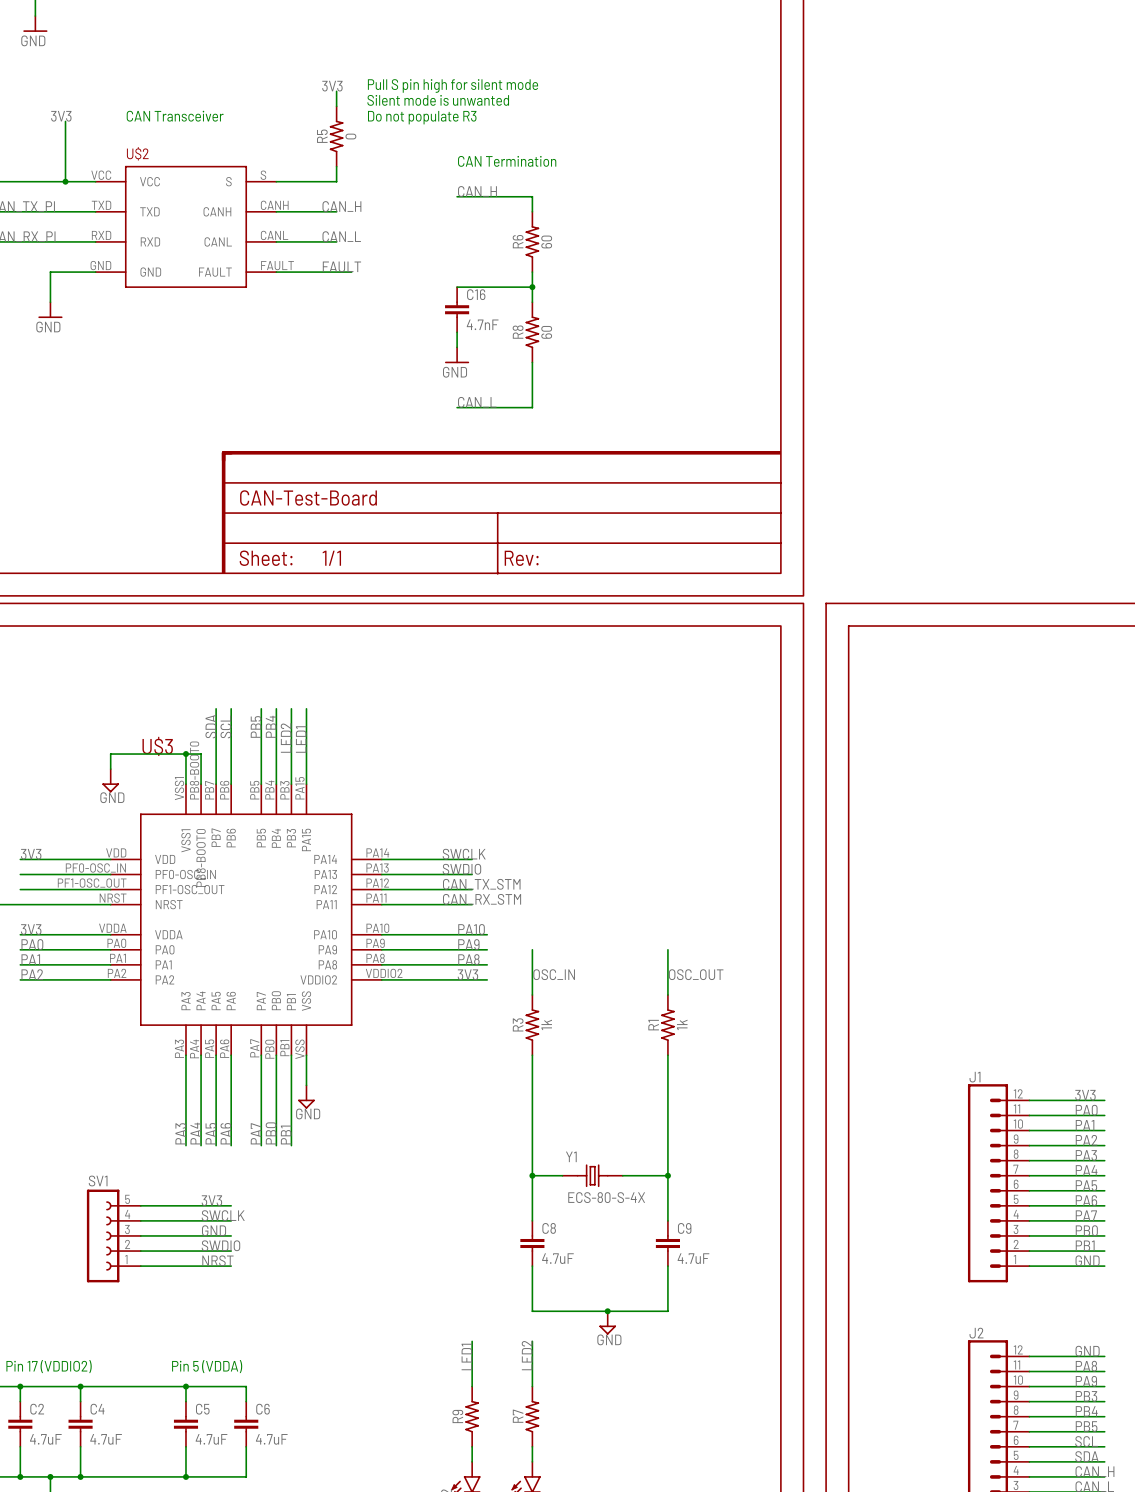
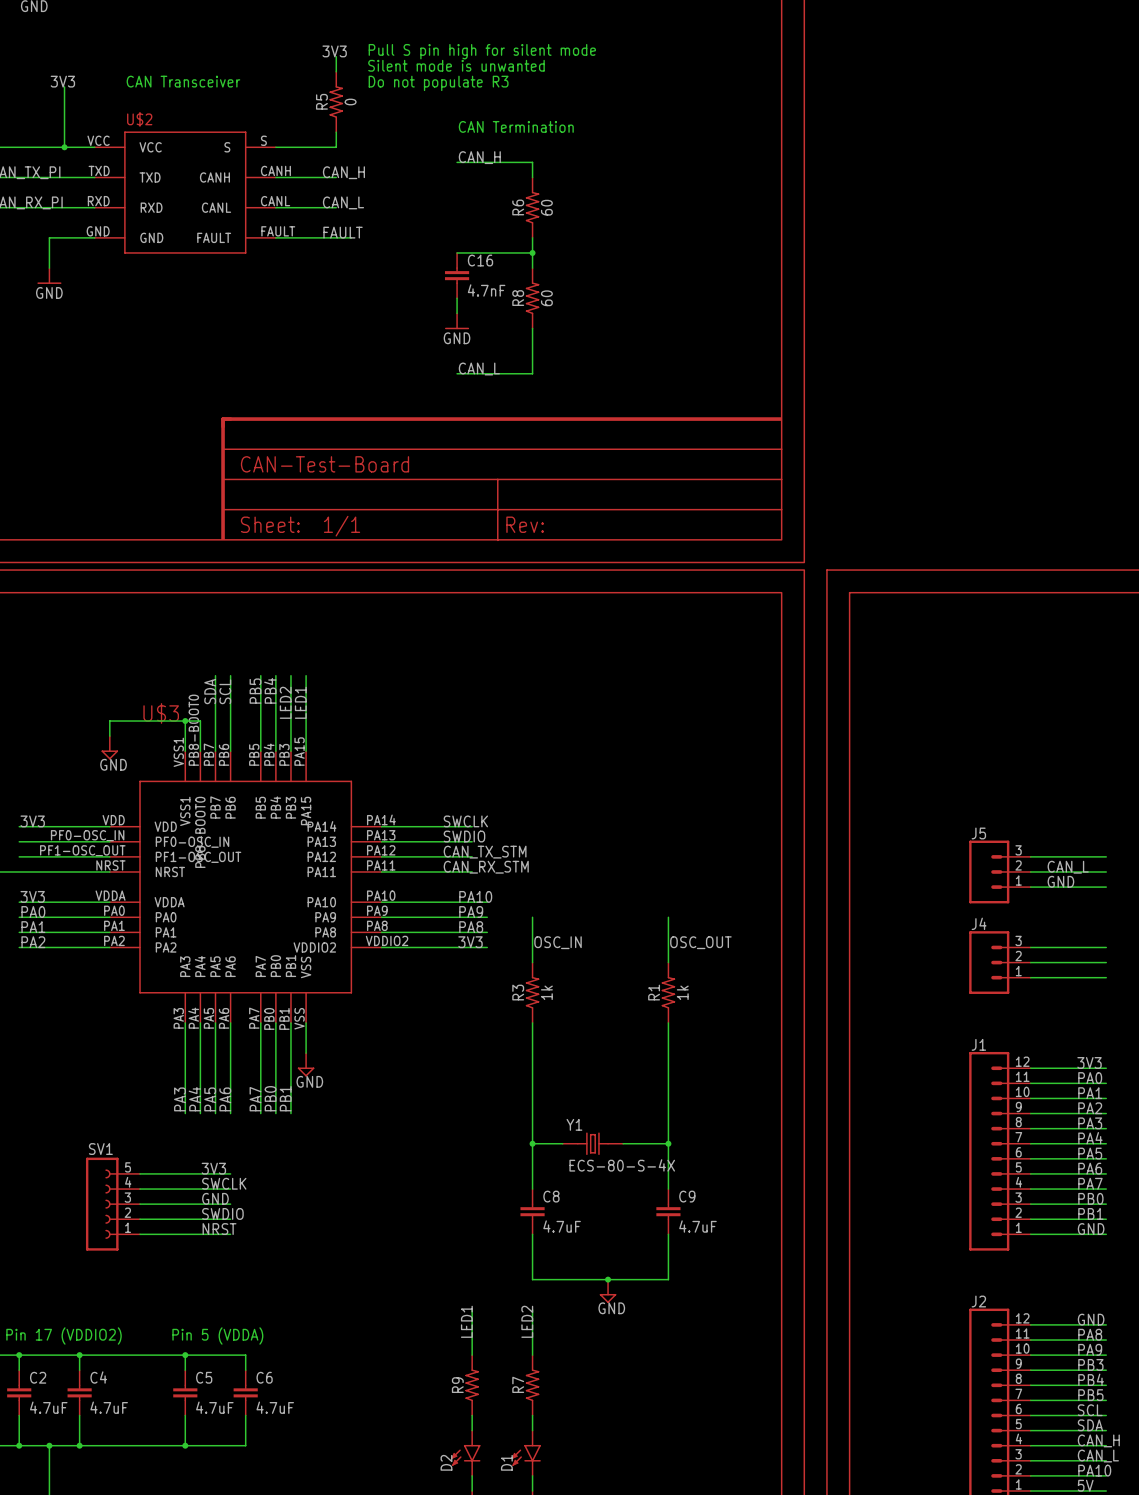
wire: none -> (1030, 856) (1106, 856)
label: none -> CAN_L (1068, 867)
J5: none -> (999, 871)
wire: none -> (1030, 871) (1106, 871)
label: none -> GND (1060, 881)
wire: none -> (1030, 887) (1106, 887)
wire: none -> (1030, 947) (1106, 947)
J4: none -> (999, 962)
wire: none -> (1030, 962) (1106, 962)
wire: none -> (1030, 977) (1106, 977)

